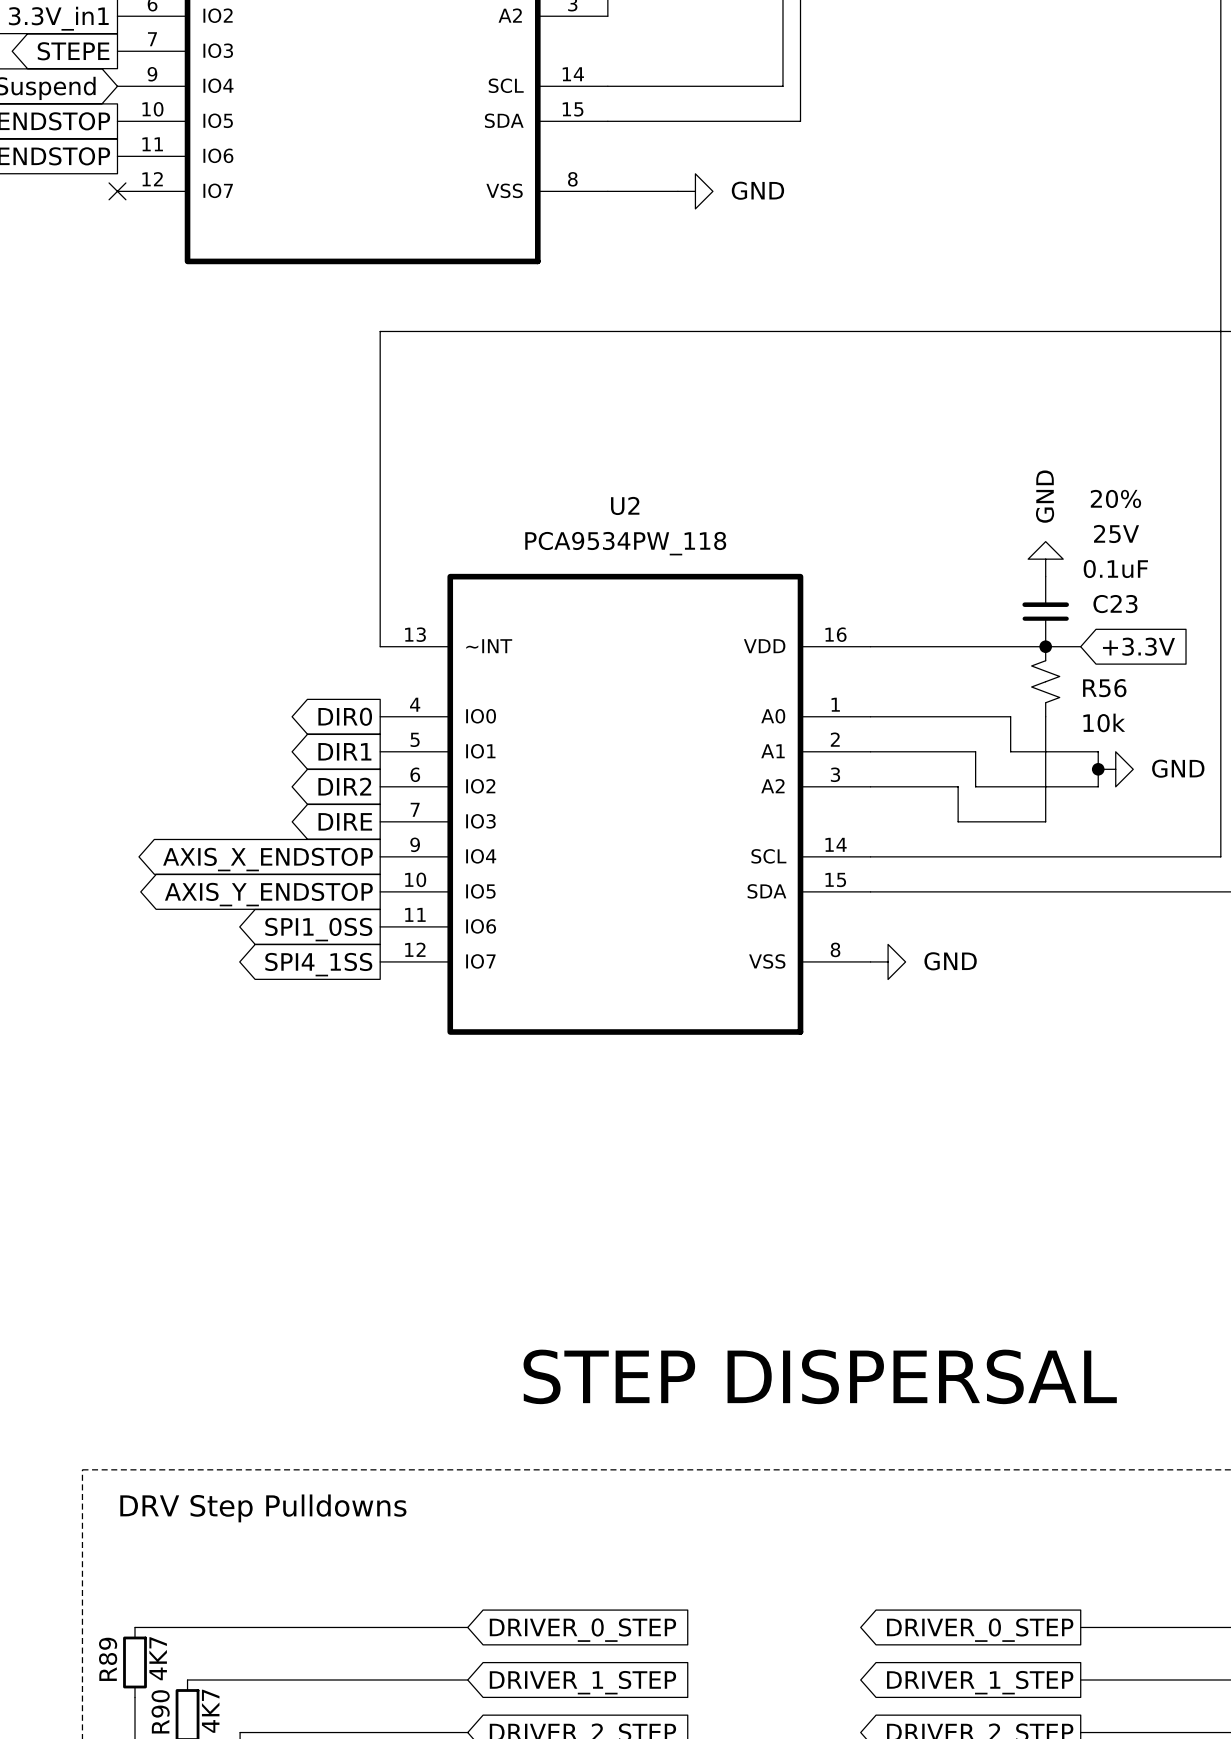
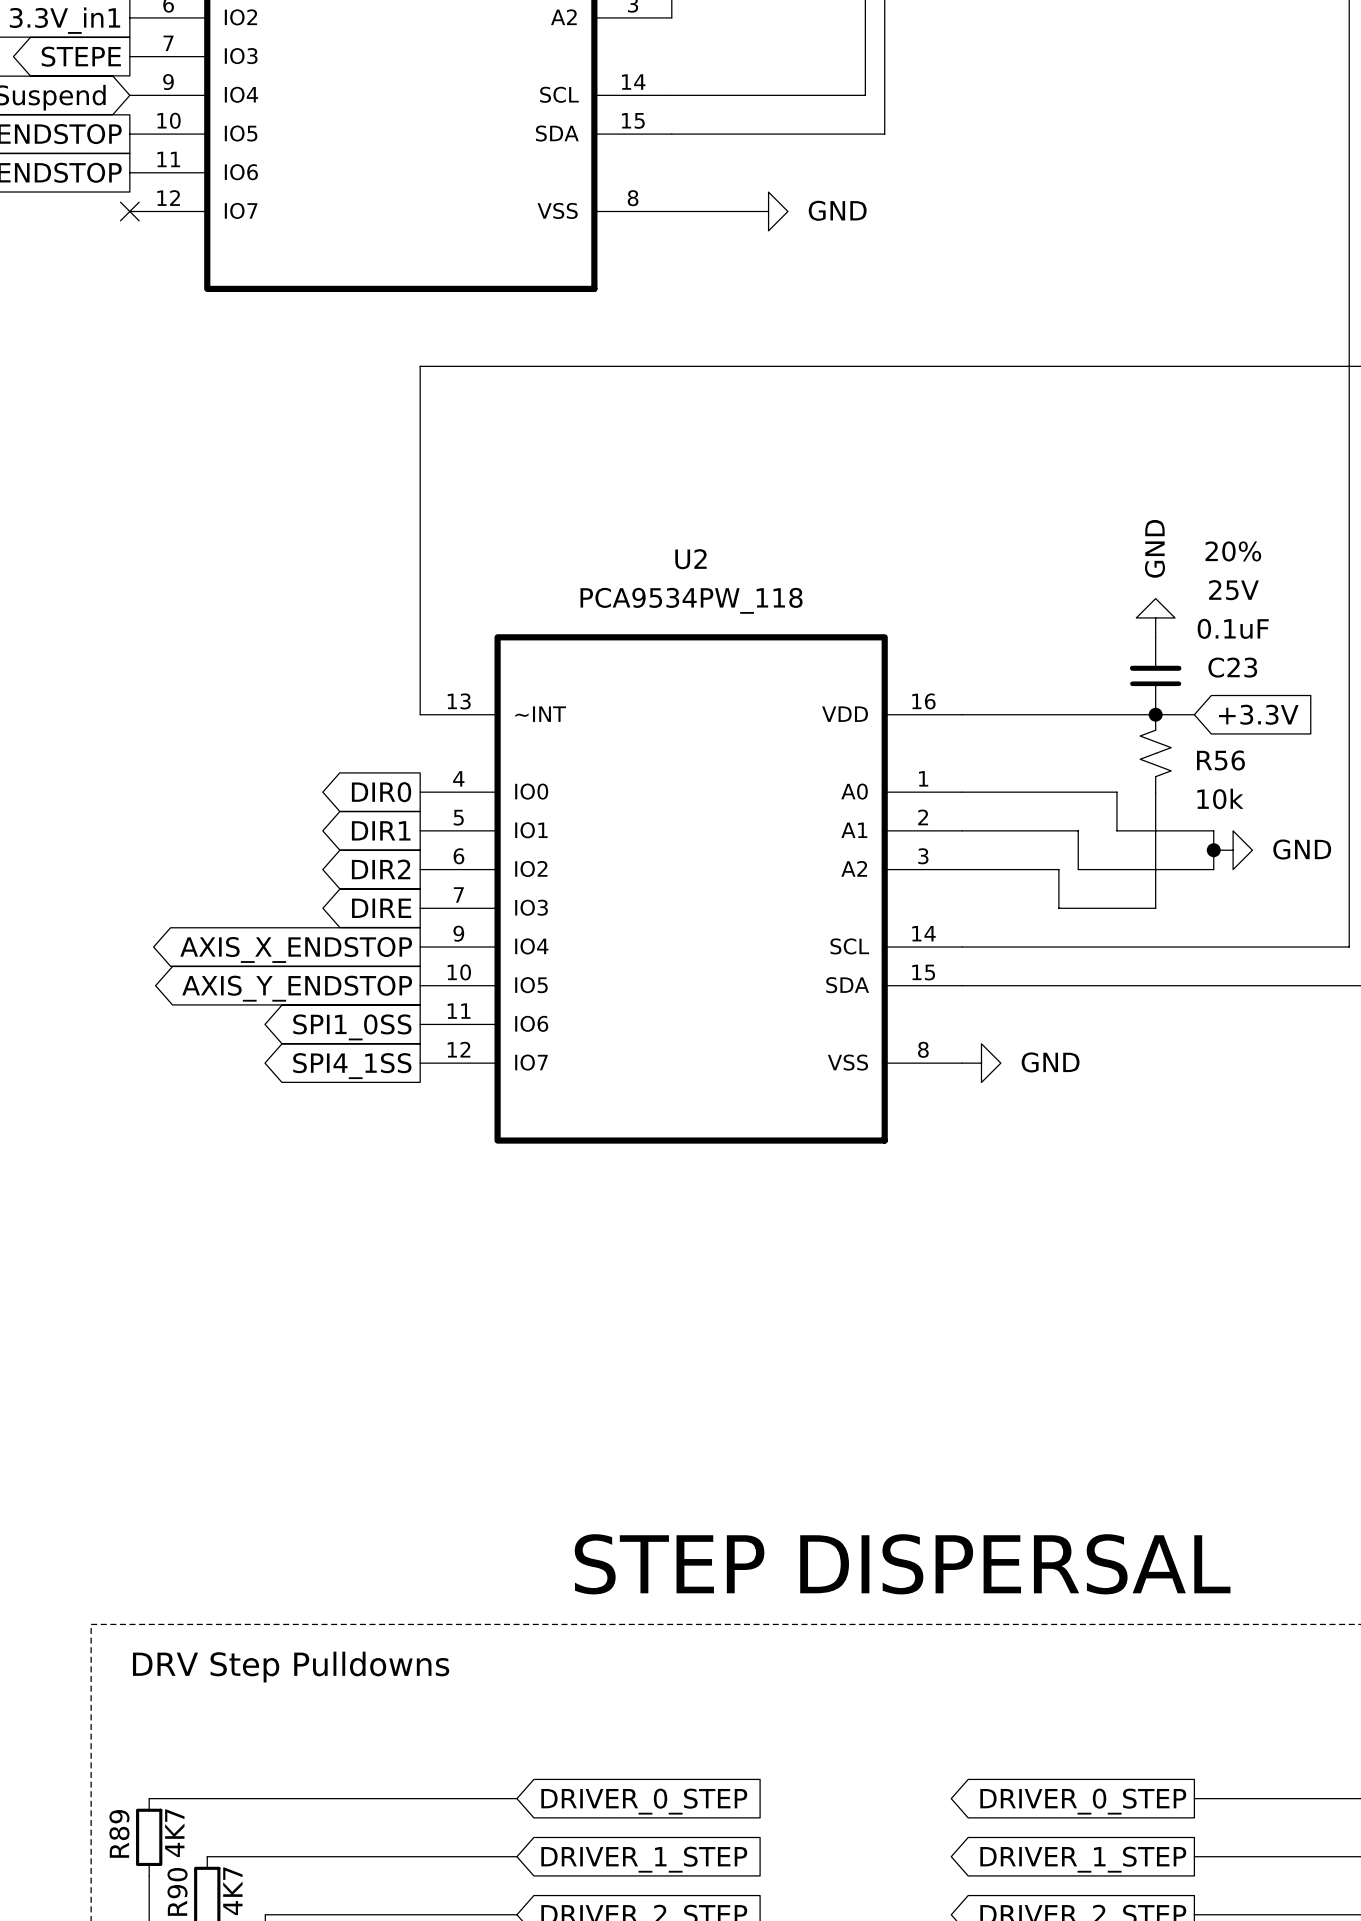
text position: STEP DISPERSAL (820, 1376) -> STEP DISPERSAL (902, 1564)

